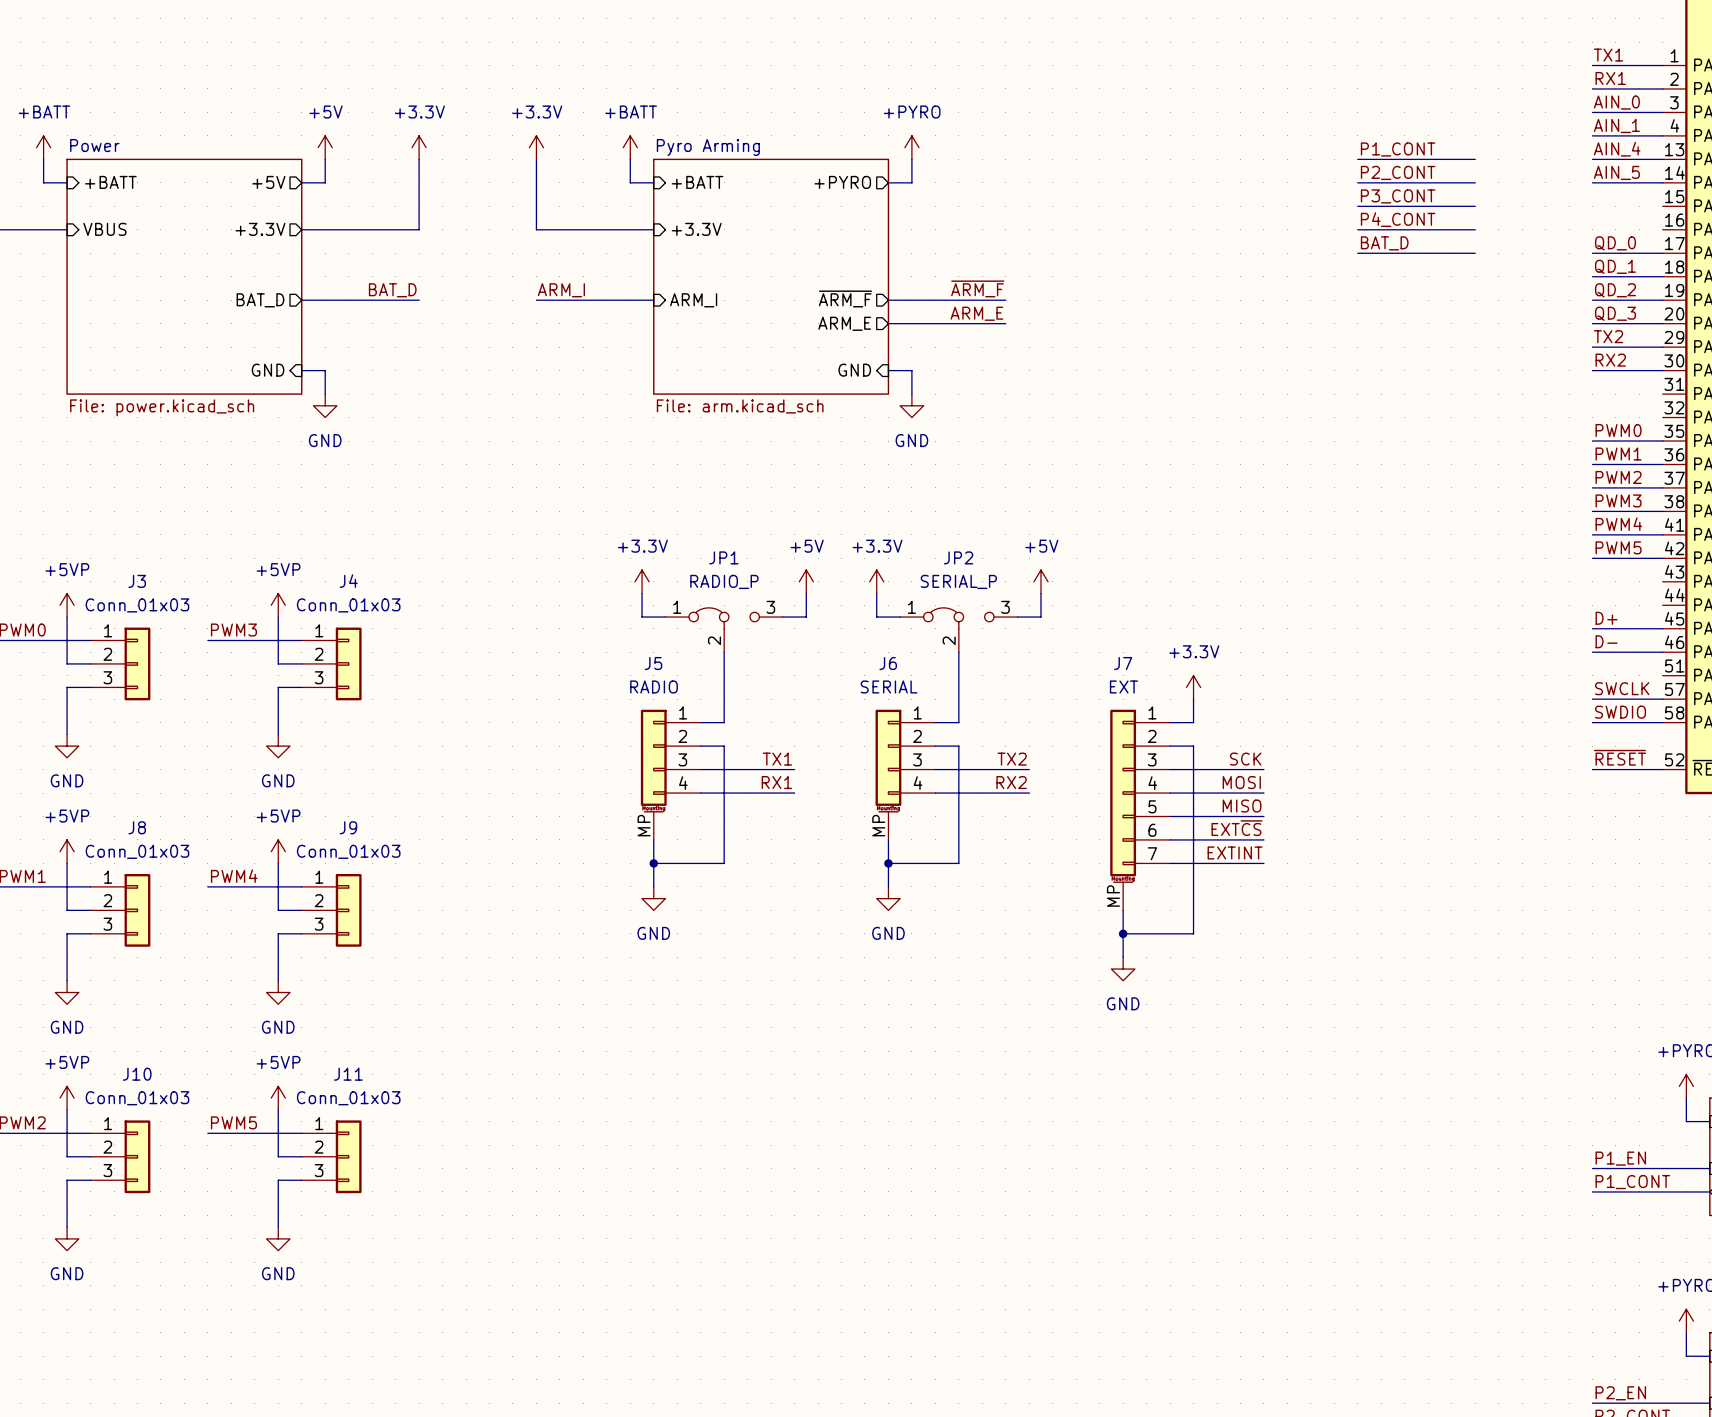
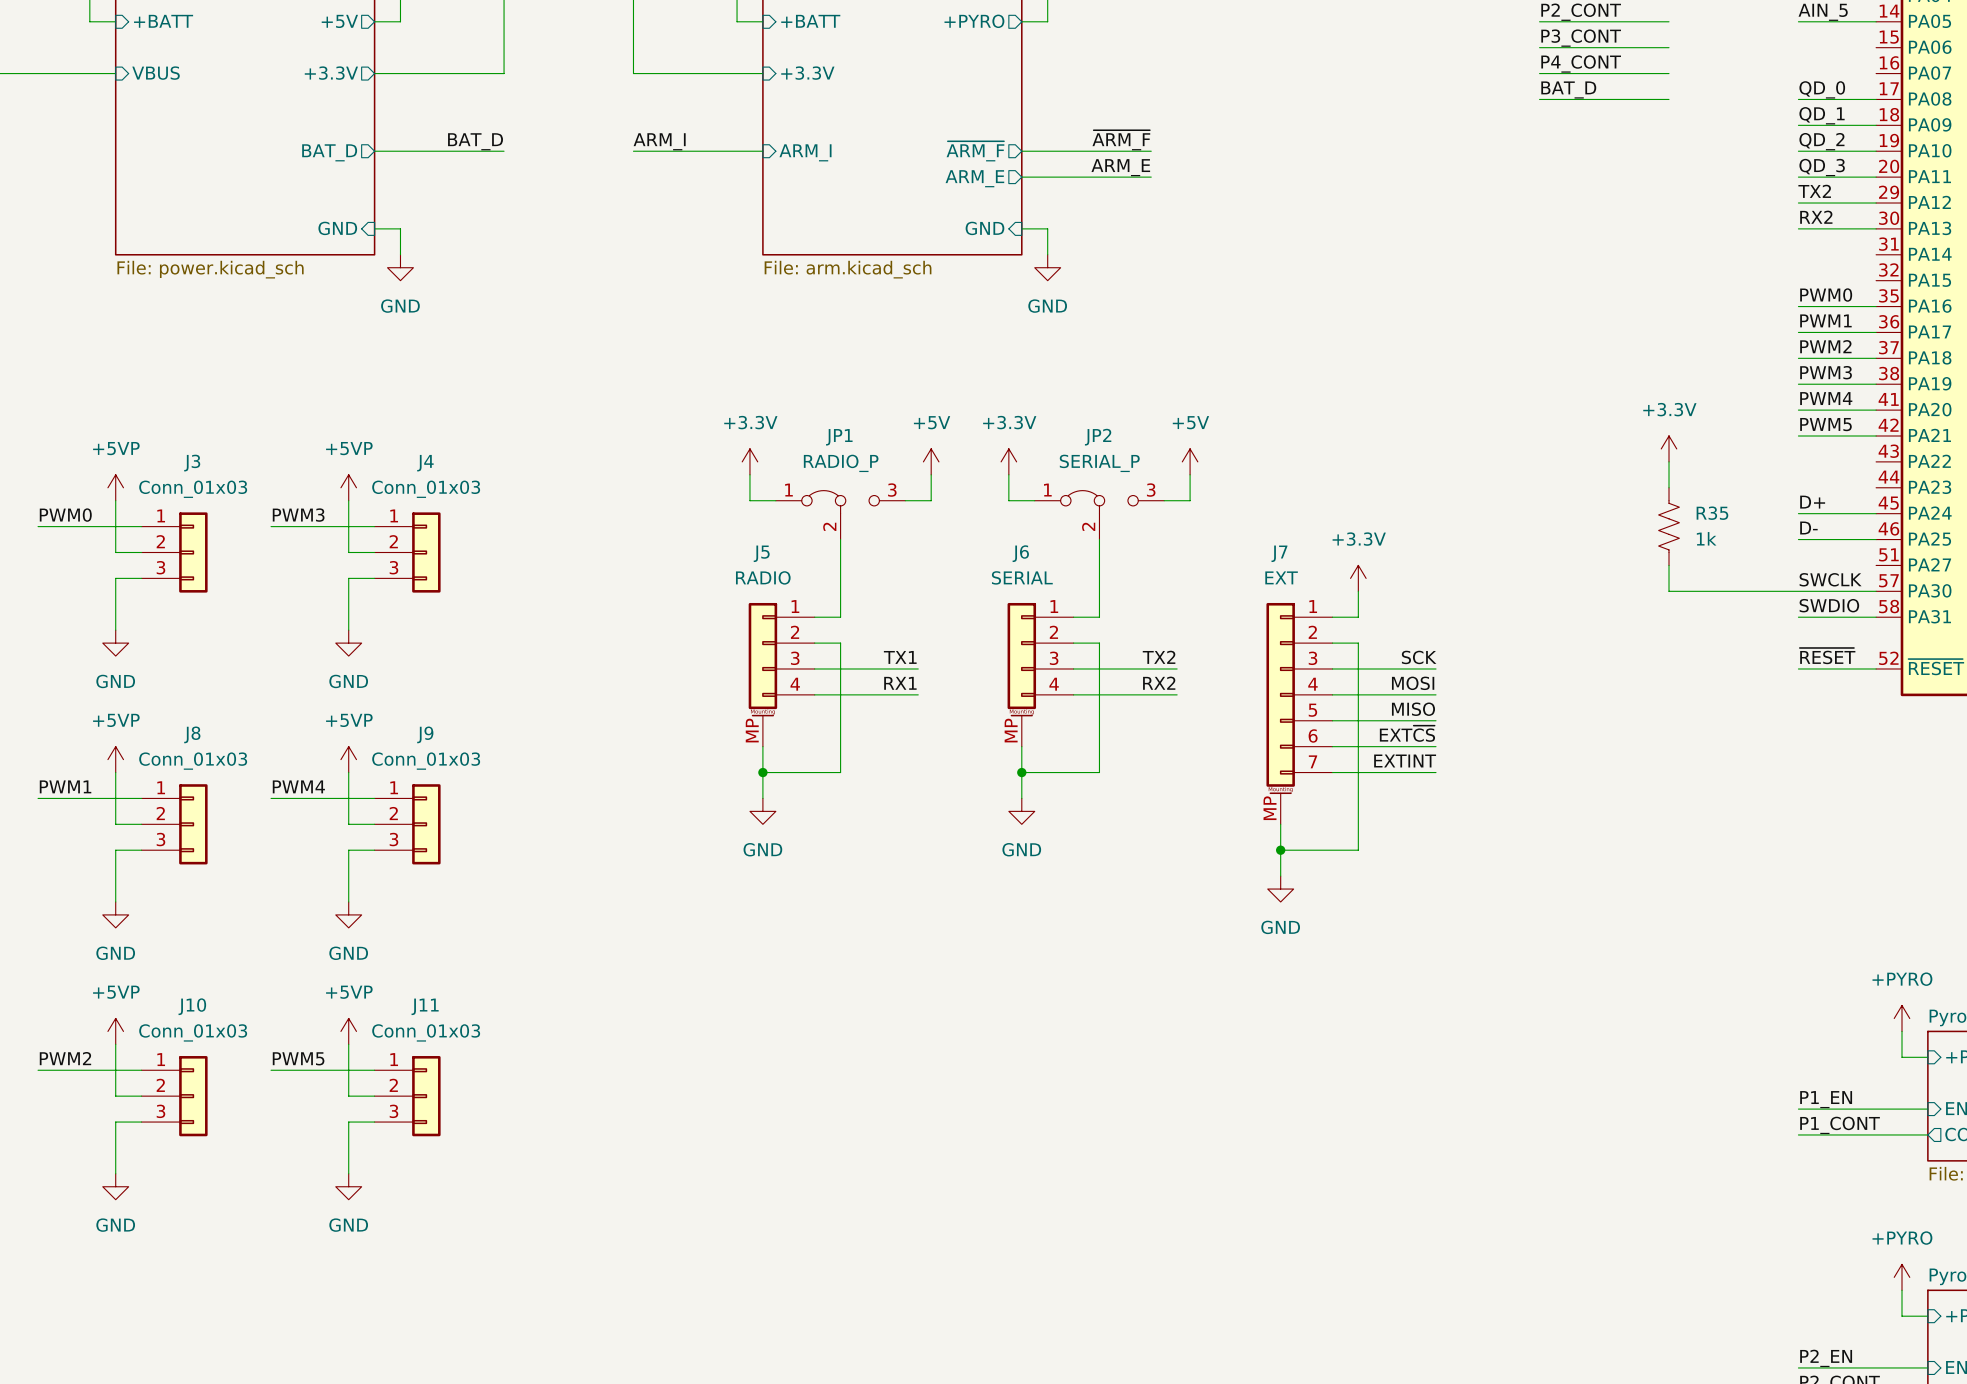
power symbol: none -> +3.3V (1669, 448)
wire: none -> (1669, 461) (1669, 487)
R35: none -> 1k (1669, 526)
wire: none -> (1669, 565) (1669, 591) (1798, 591)

